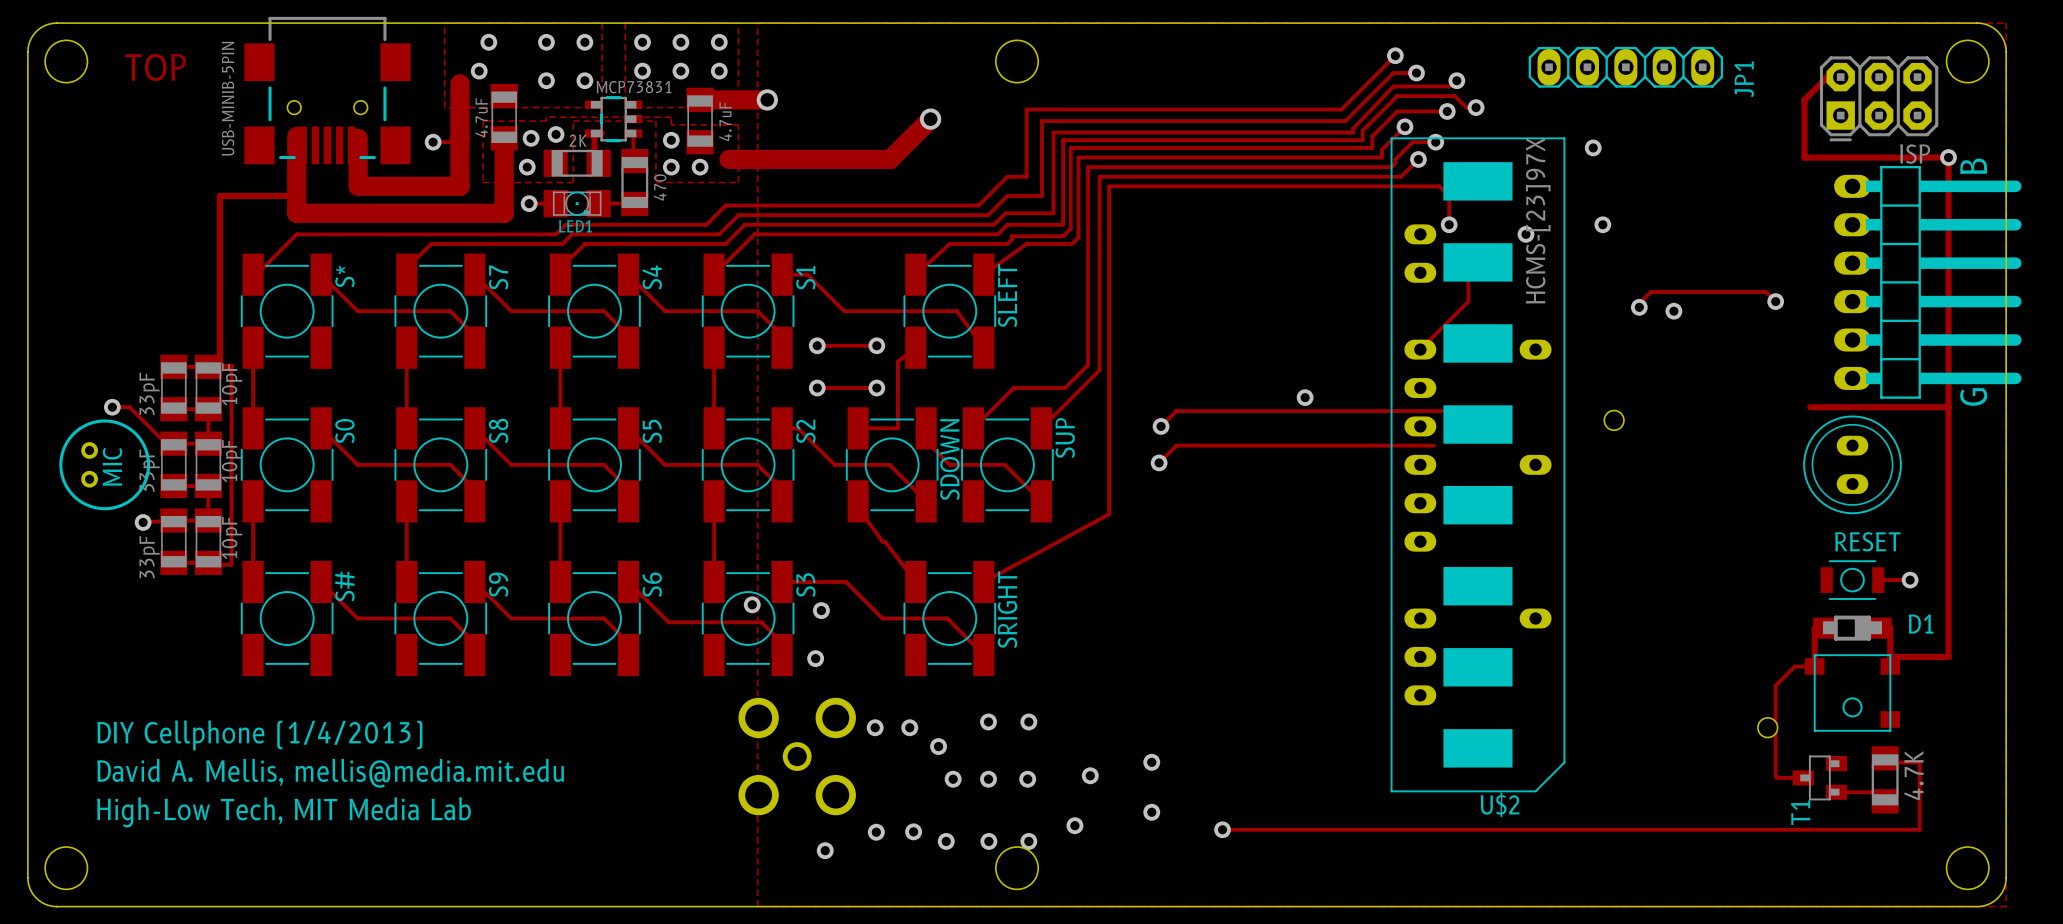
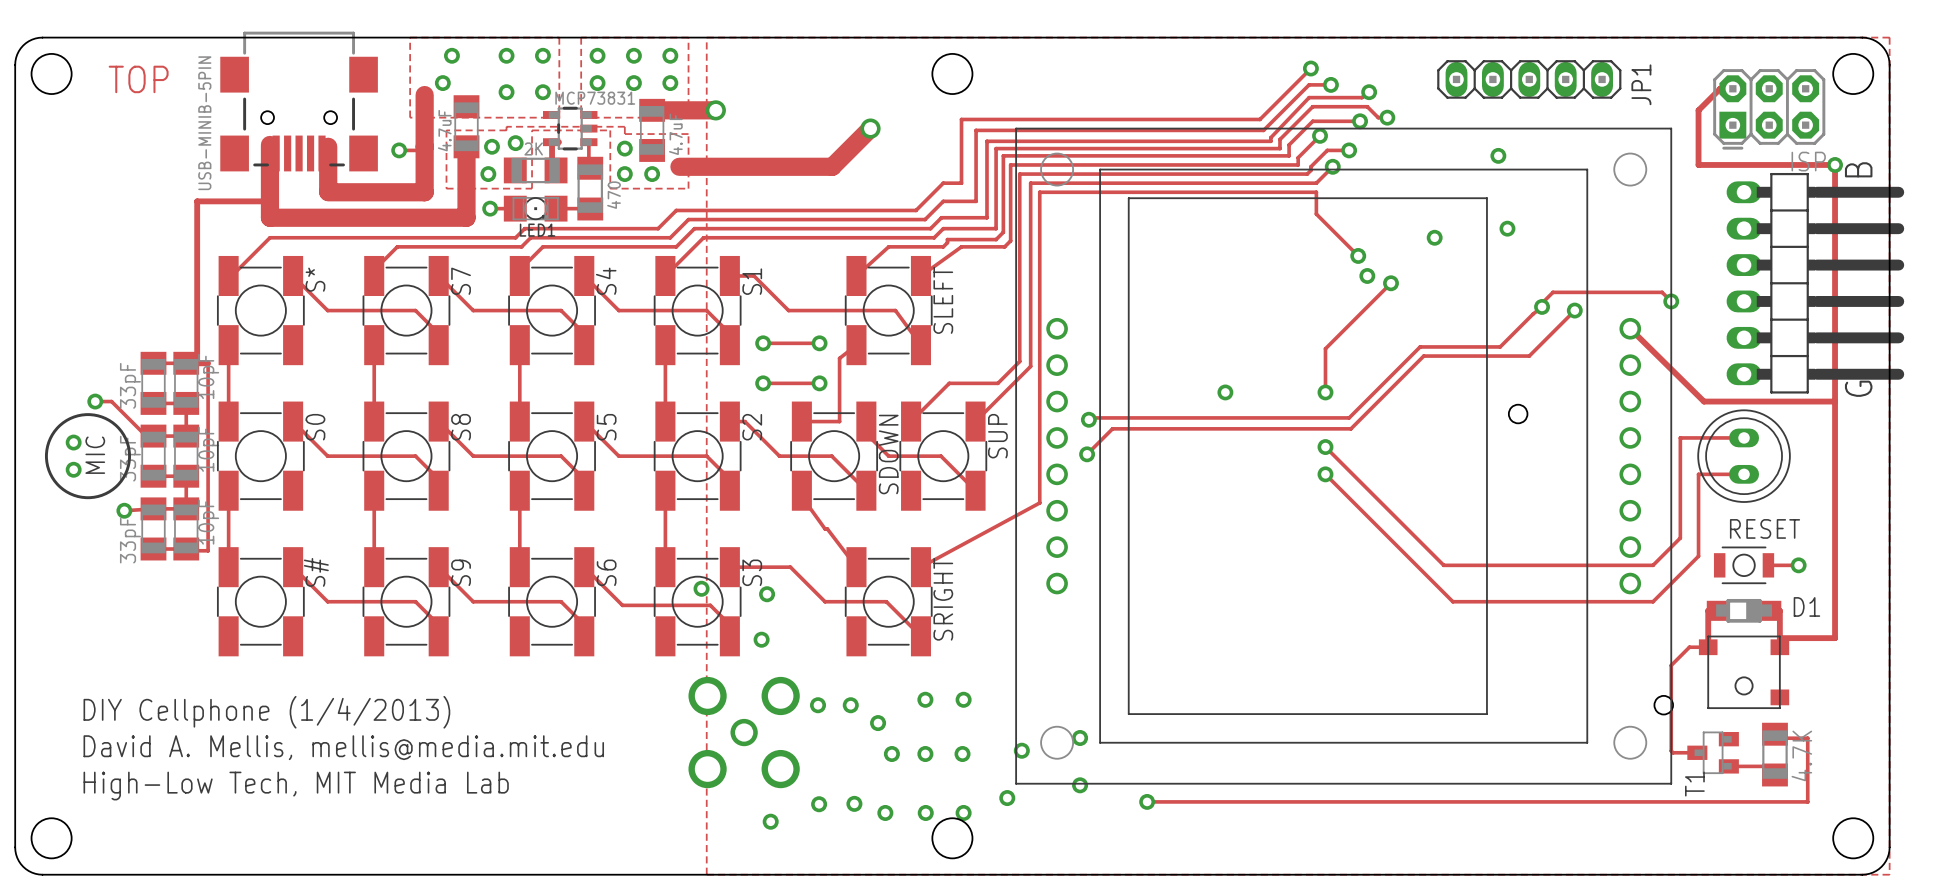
track: (1401, 186) (1439, 186) (1449, 195) (1449, 224) -> (1316, 192) (1316, 214) (1358, 255)
via: (1449, 224) -> none
via: none -> (1358, 255)
track: (1468, 272) (1468, 301) (1420, 349) -> none
via: none -> (1367, 275)
track: none -> (1390, 283) (1325, 348) (1325, 392)
via: none -> (1390, 283)
track: none -> (1630, 328) (1704, 401)
via: none -> (1325, 392)
track: (1449, 411) (1176, 411) (1162, 424) -> (1542, 306) (1500, 346) (1420, 346) (1349, 417) (1090, 417)
track: (1176, 445) (1433, 445) -> (1103, 437) (1112, 428) (1350, 428) (1423, 356) (1529, 356) (1574, 310)
track: none -> (1744, 437) (1680, 437) (1680, 538) (1653, 565) (1443, 565) (1325, 447)
via: none -> (1325, 447)
part: none -> (1343, 456)
U$2: HCMS-[23]97X (1477, 464) -> none
track: none -> (1325, 474) (1452, 601) (1653, 601) (1698, 556) (1698, 474) (1744, 474)
via: none -> (1325, 474)

